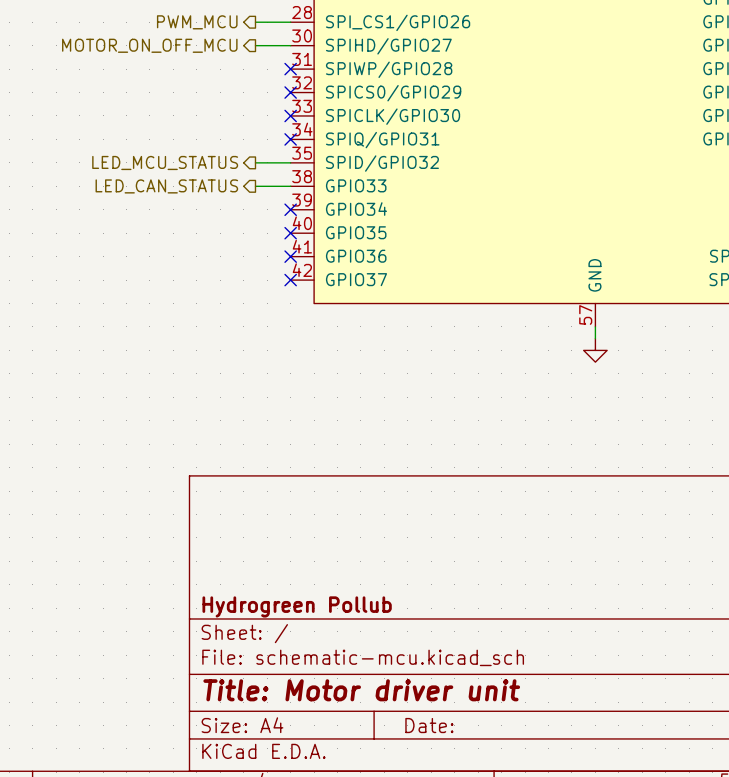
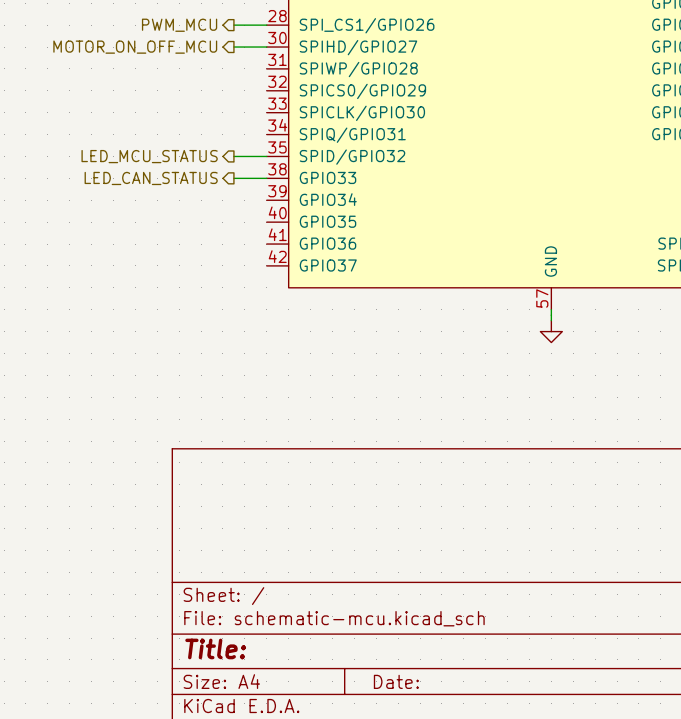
no-connect mark: (290, 69) -> none
no-connect mark: (290, 92) -> none
no-connect mark: (290, 115) -> none
no-connect mark: (290, 139) -> none
no-connect mark: (290, 209) -> none
no-connect mark: (290, 233) -> none
no-connect mark: (290, 256) -> none
no-connect mark: (290, 280) -> none
title block: Hydrogreen Pollub (297, 606) -> none
title block: Title: Motor driver unit (361, 690) -> Title: (215, 648)

